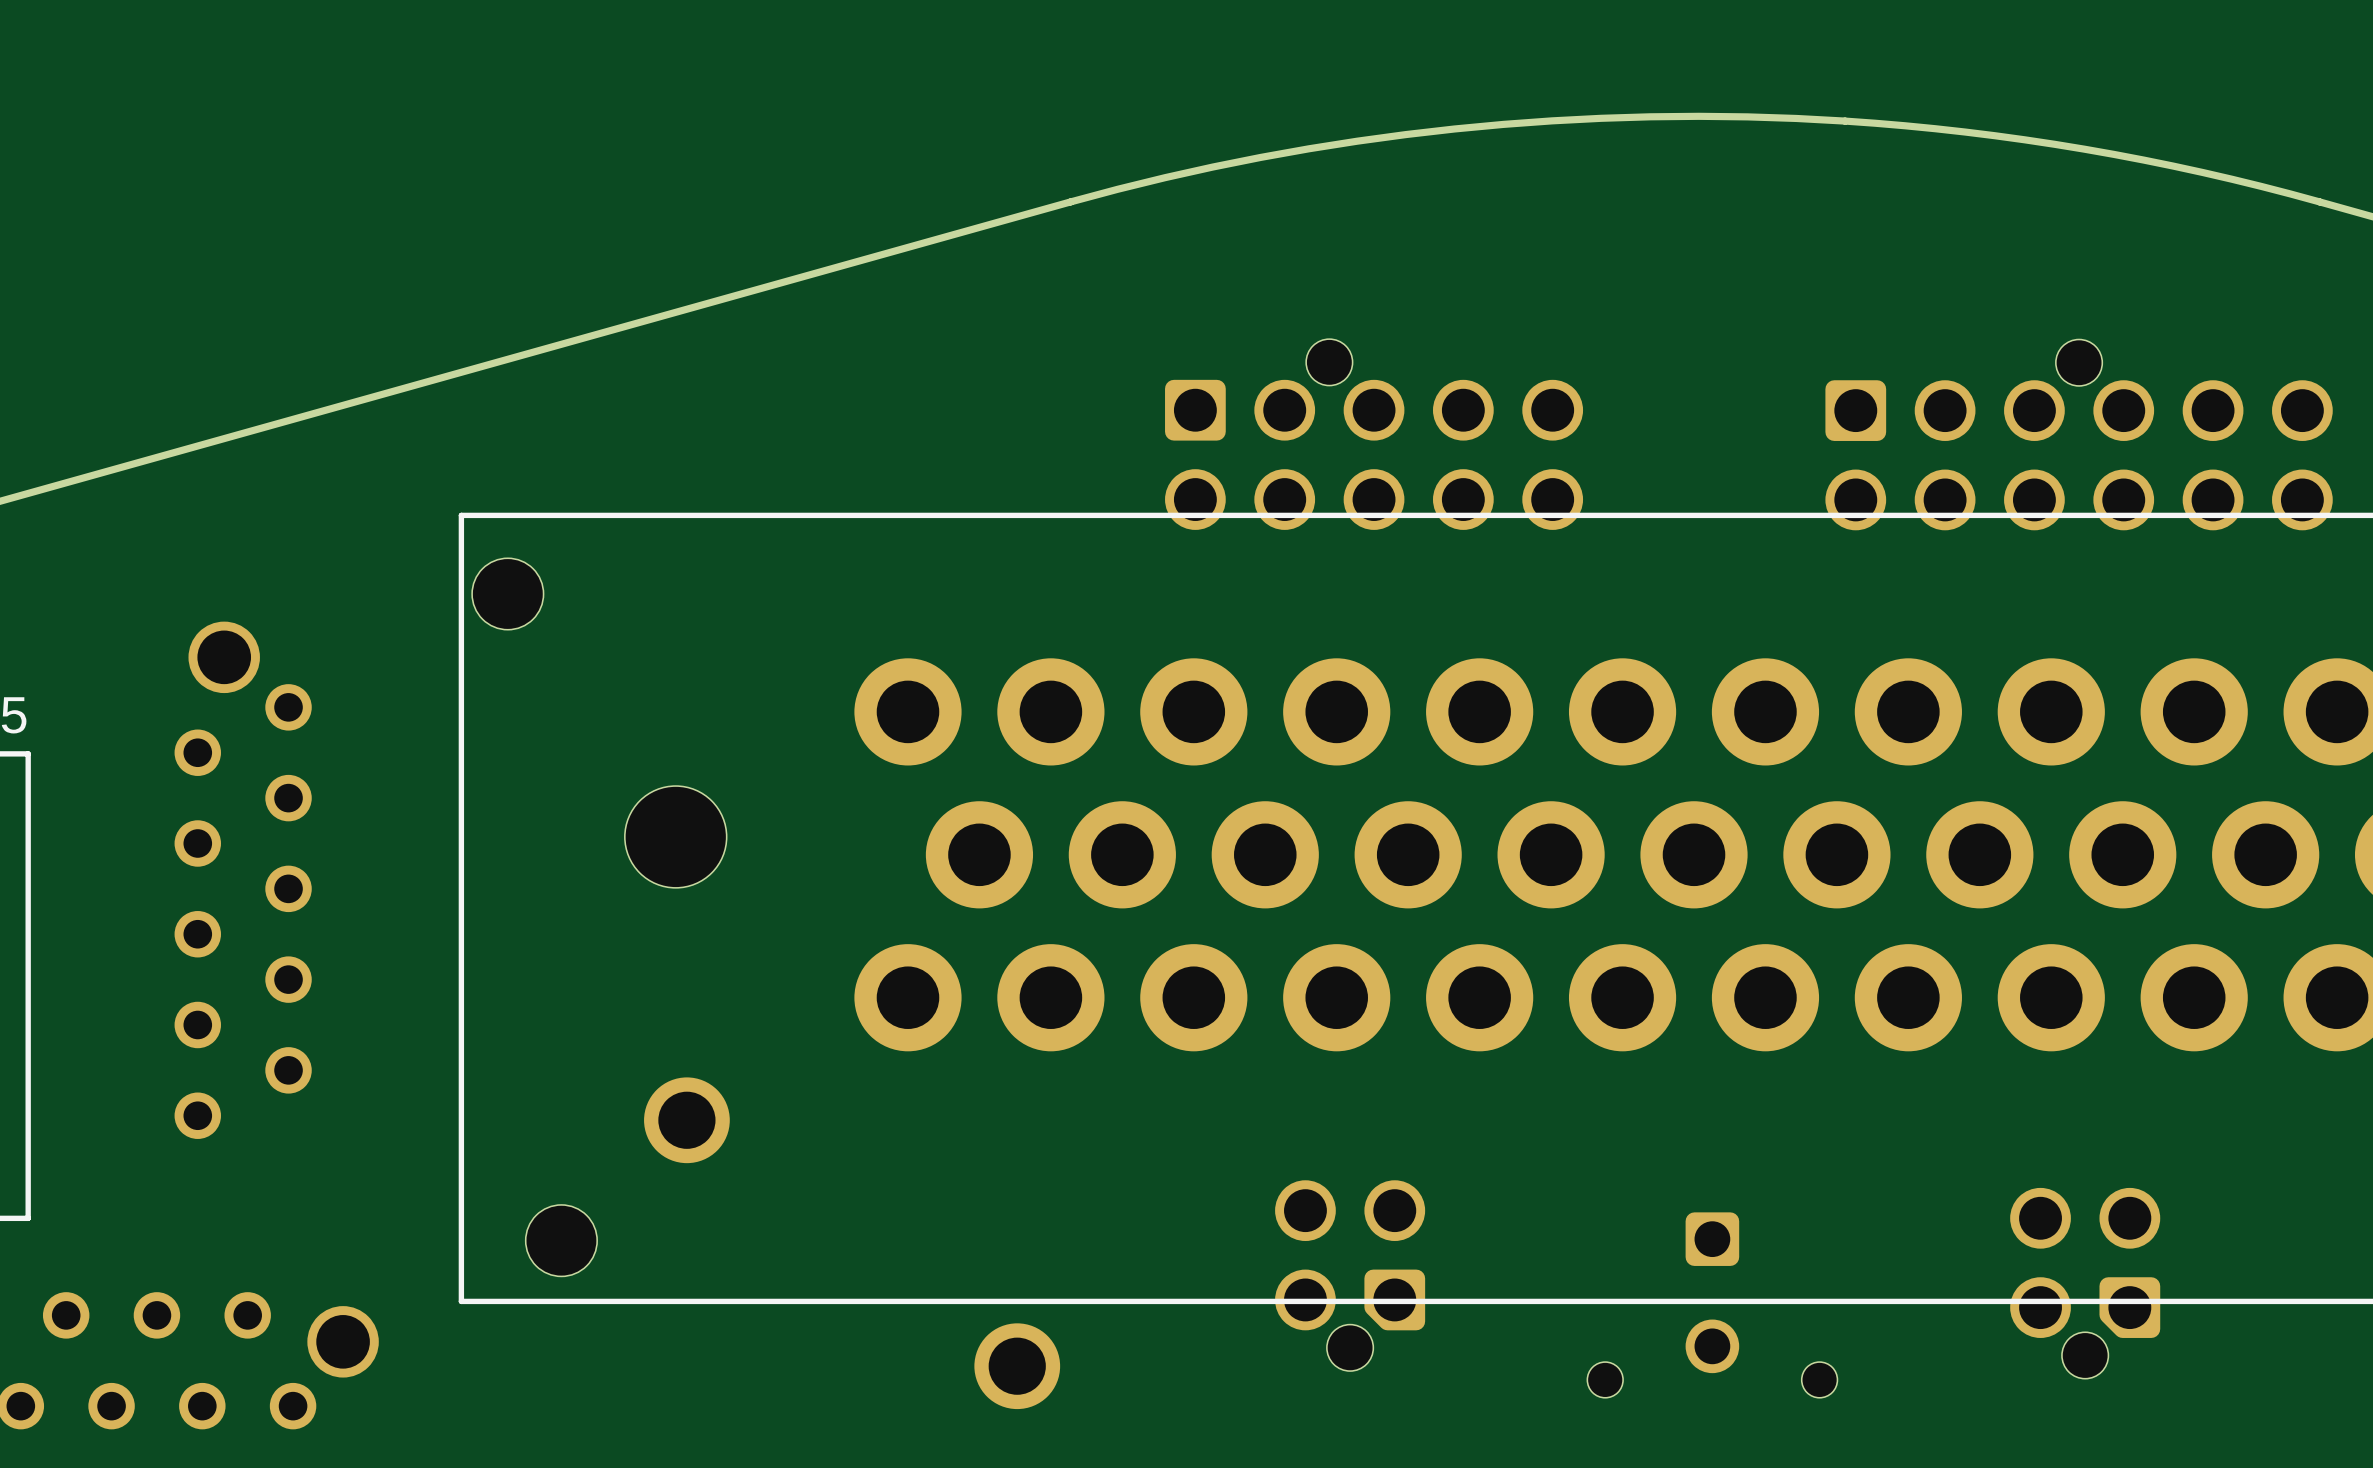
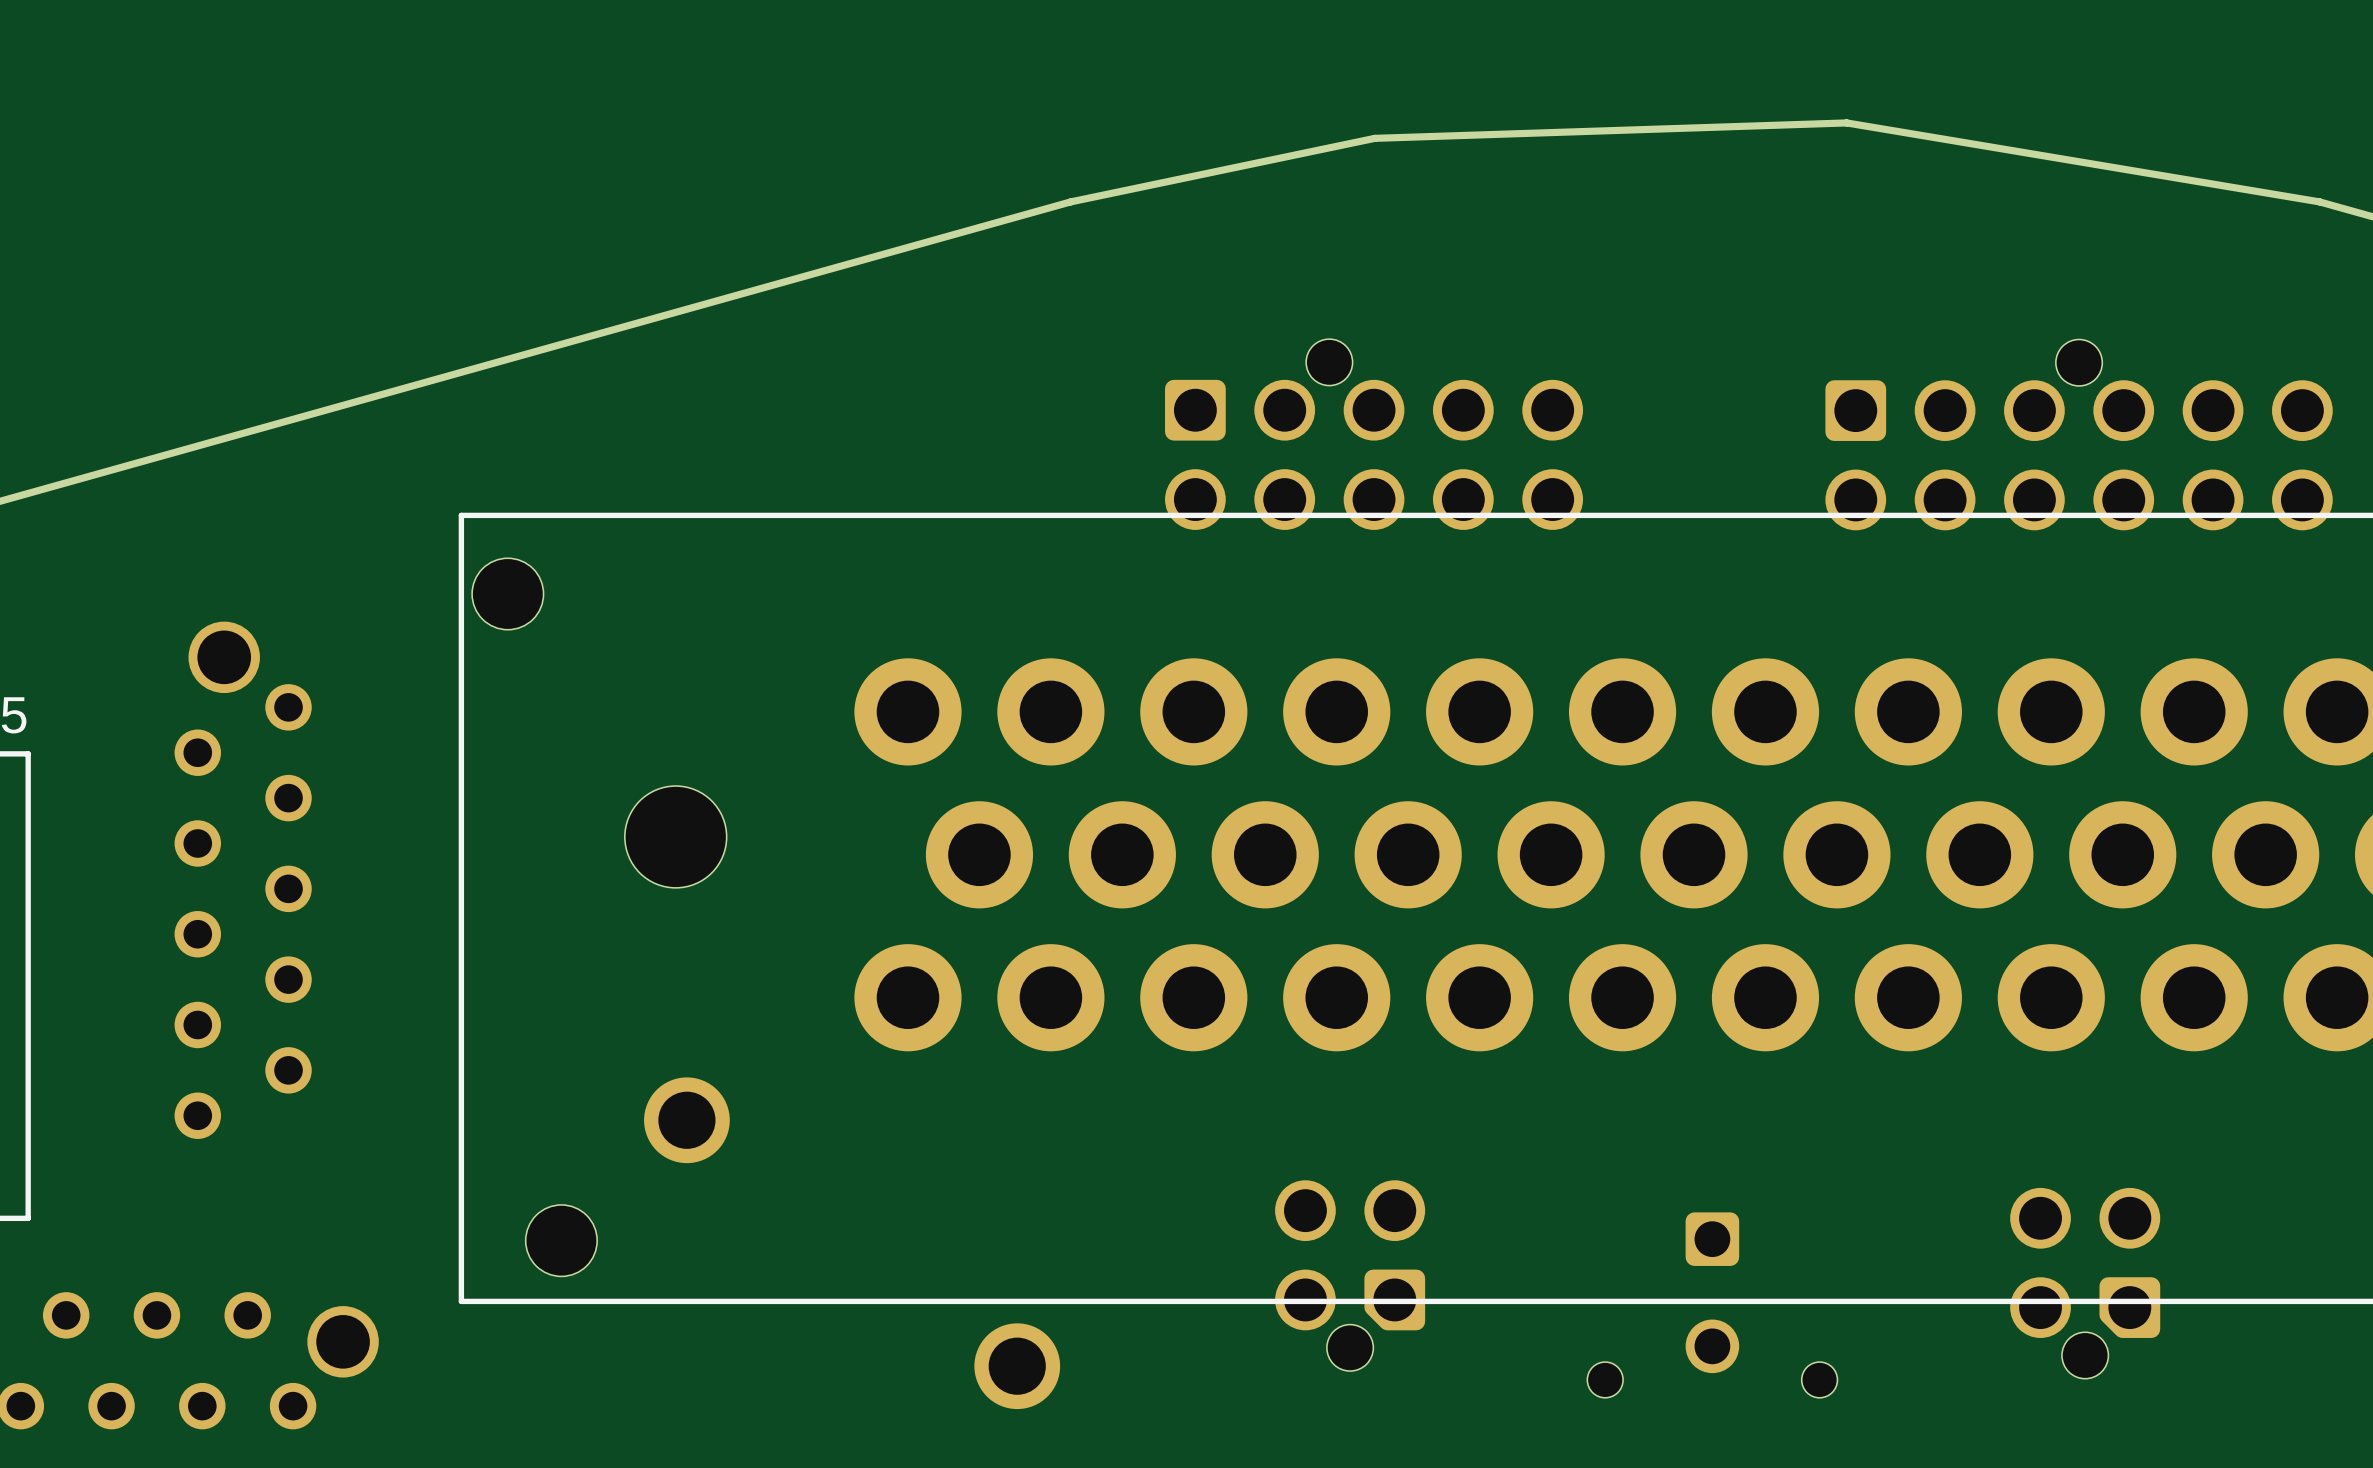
board edge: (2319, 201) (2173, 166) (2024, 139) (1875, 123) (1796, 118) (1698, 116) (1552, 120) (1454, 128) (1357, 141) (1212, 167) (1070, 201) -> (2319, 201) (1846, 122) (1374, 138) (1070, 201)

